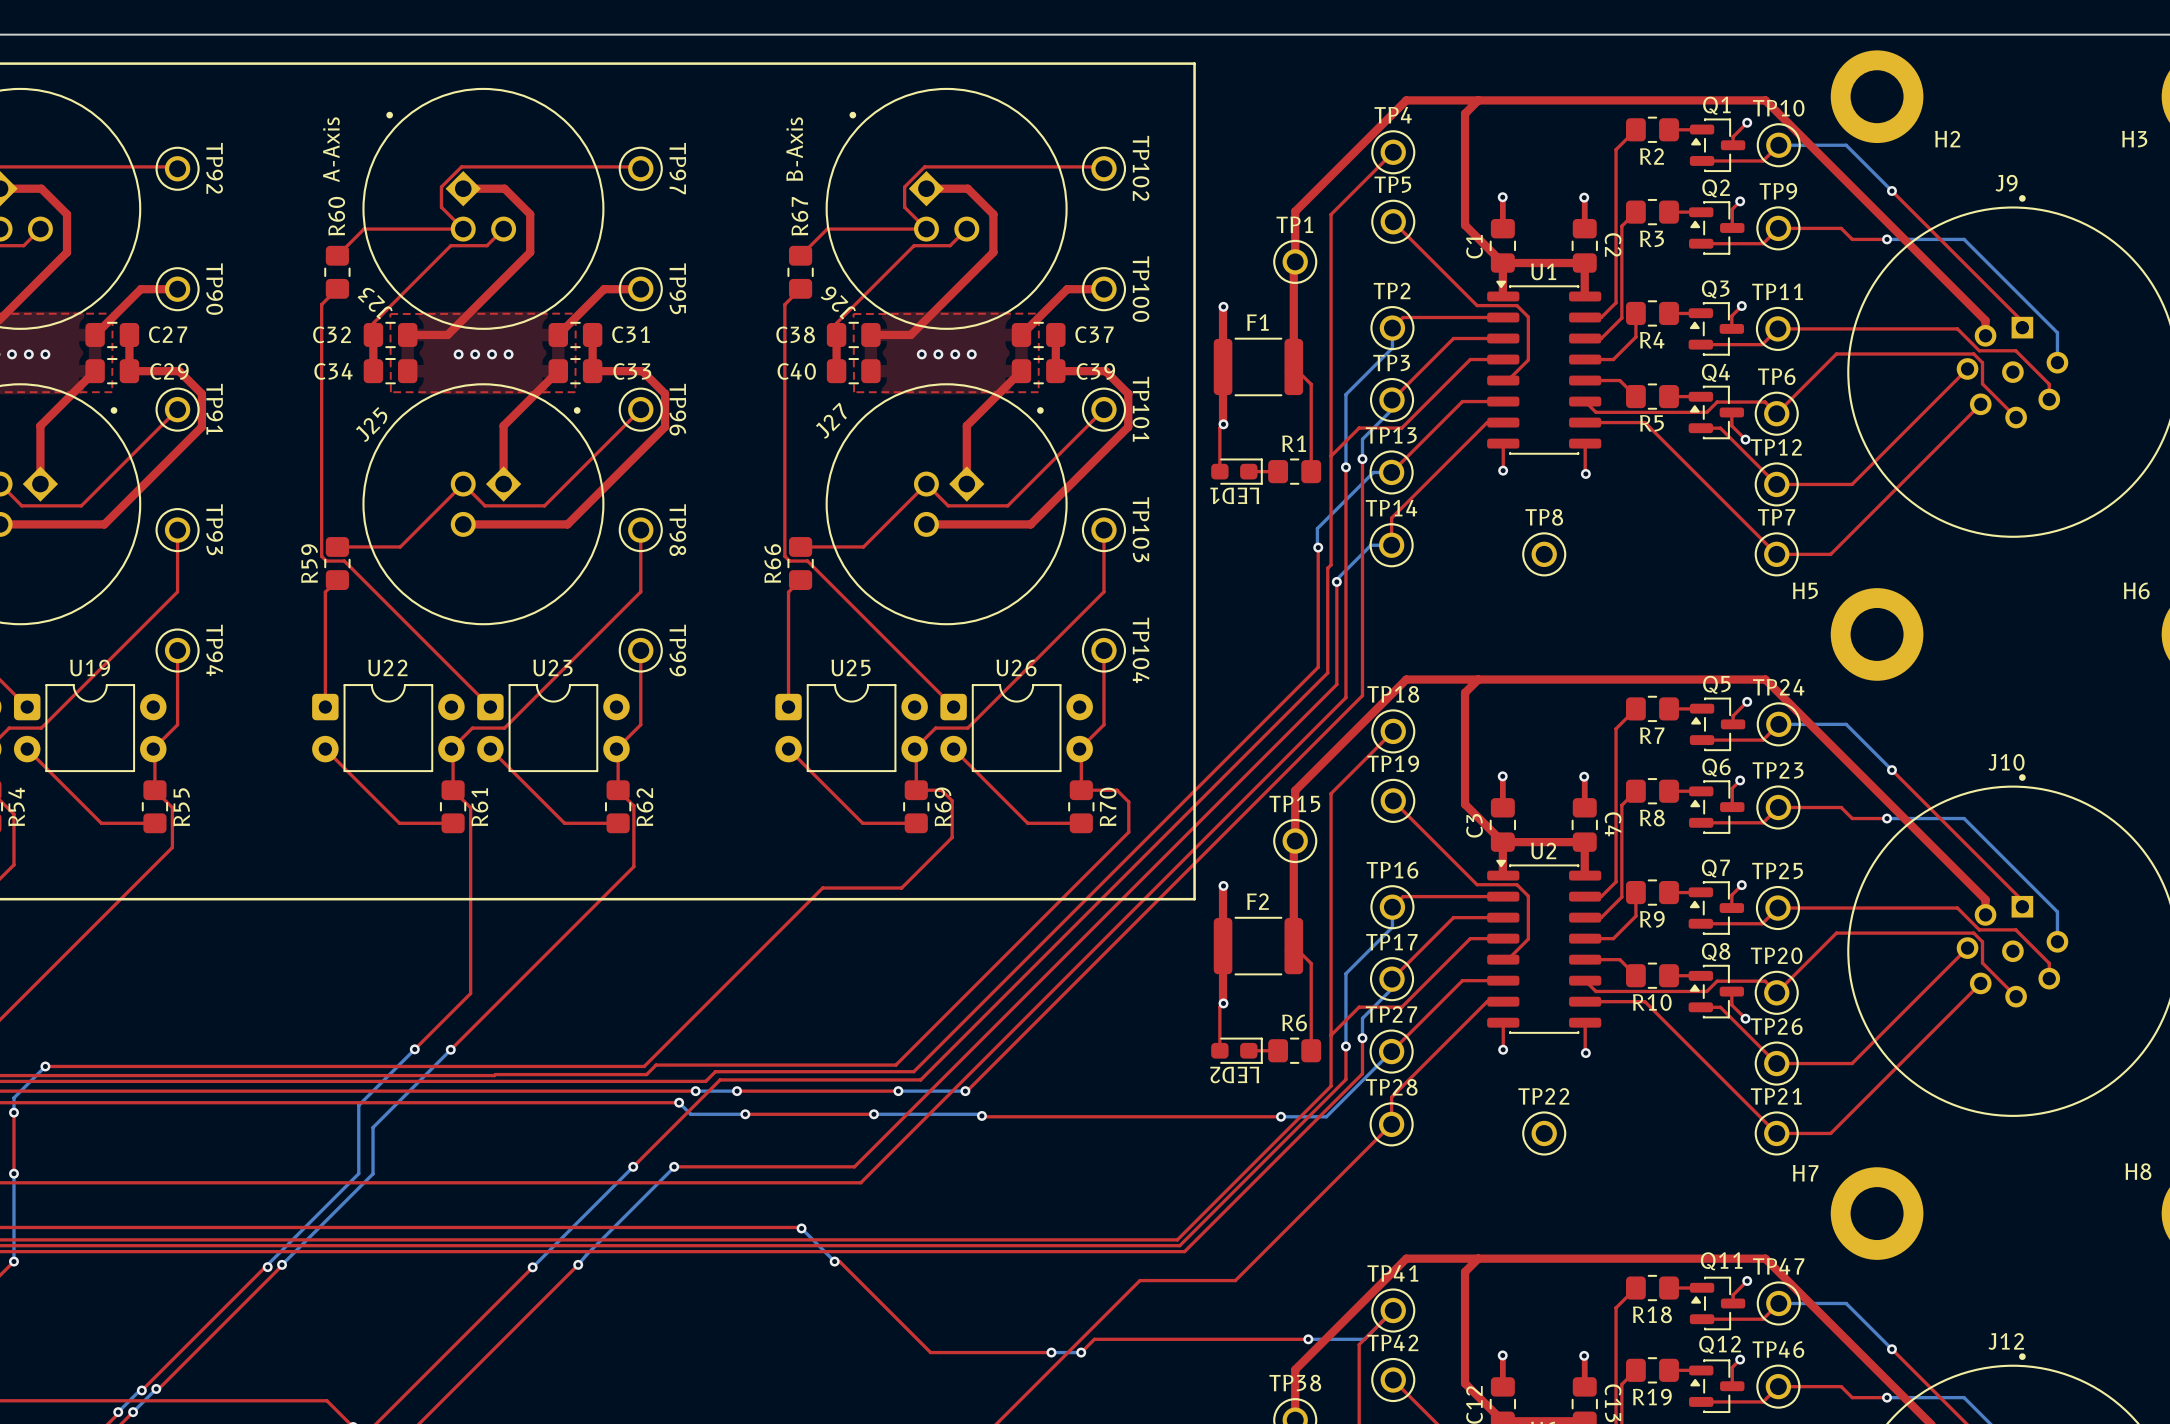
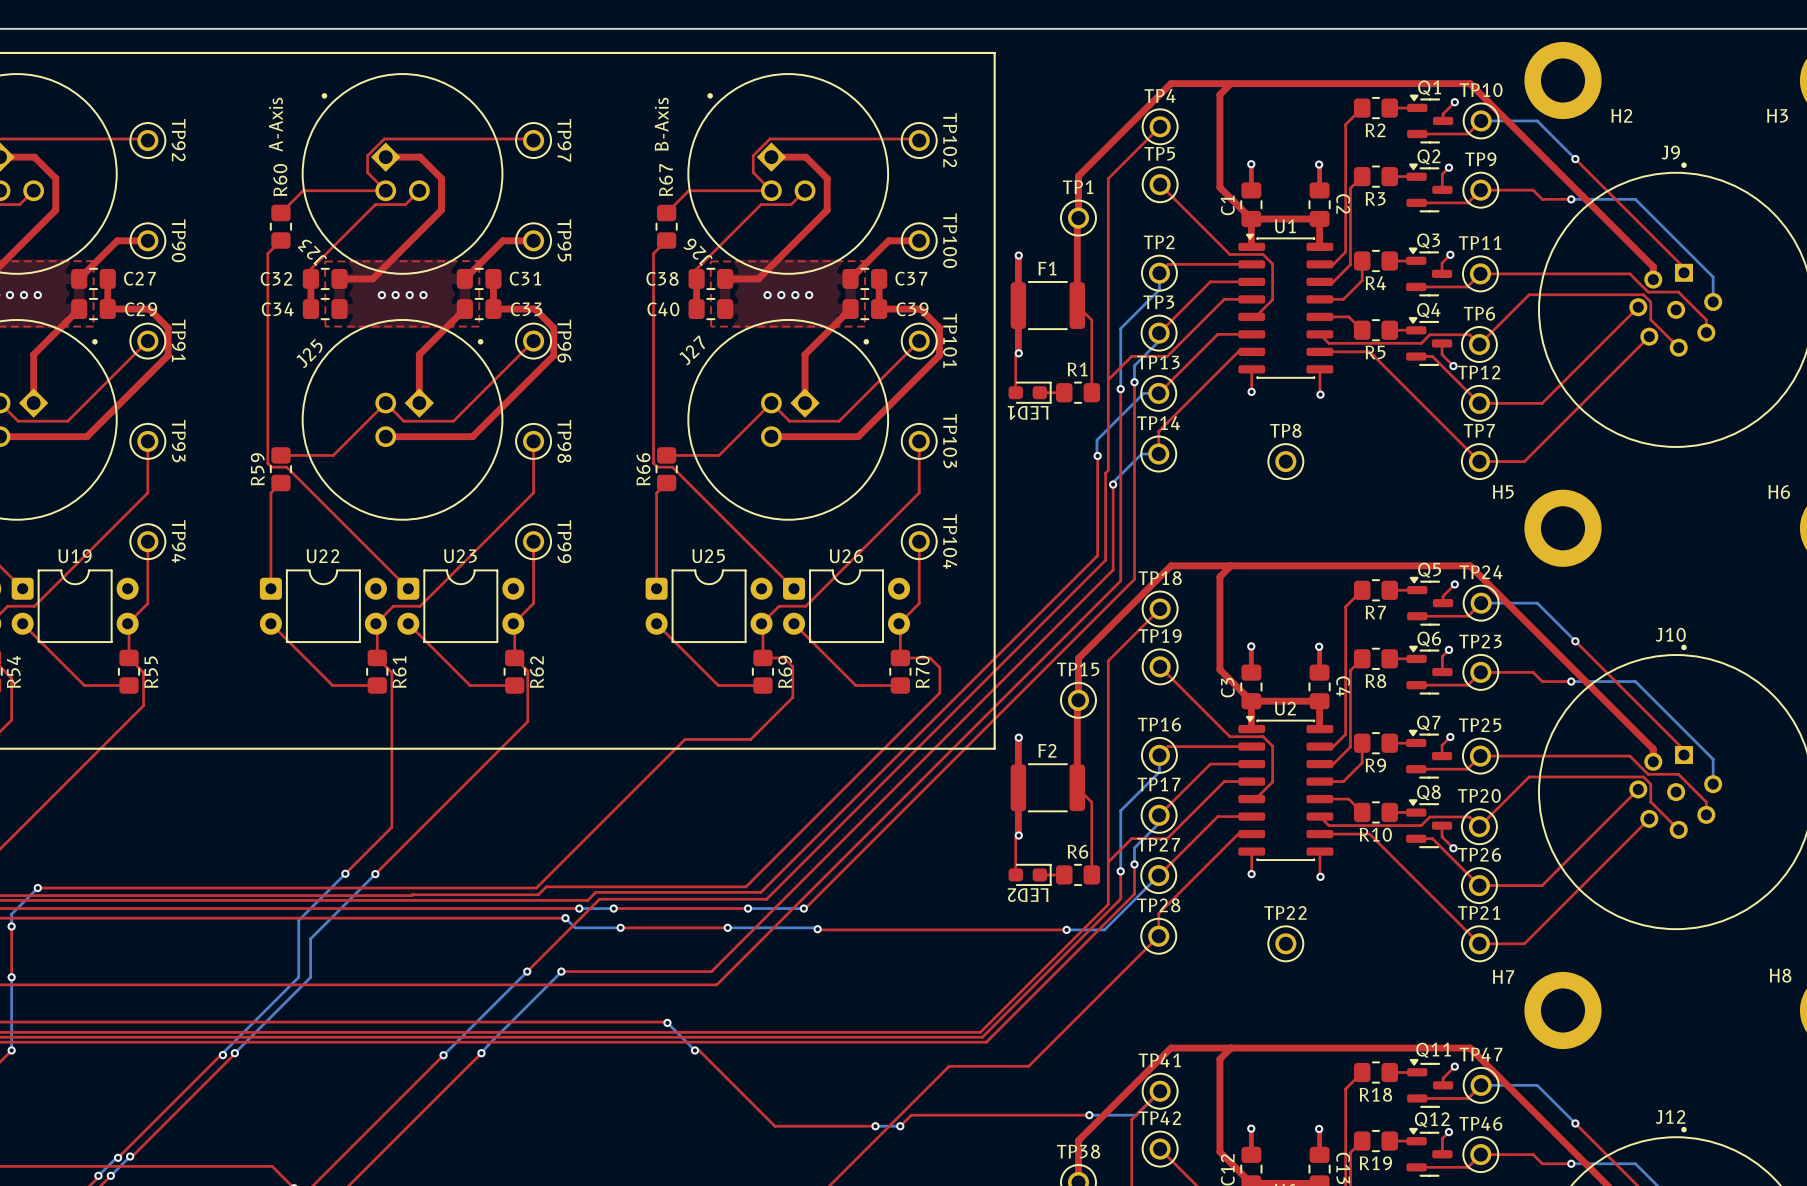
Q1 footprint: [1689, 118, 1746, 173] -> [1407, 94, 1454, 144]
Q2 footprint: [1689, 201, 1745, 255] -> [1406, 163, 1453, 213]
Q3 footprint: [1688, 302, 1745, 356] -> [1406, 247, 1453, 297]
Q4 footprint: [1688, 385, 1745, 440] -> [1406, 317, 1453, 366]
Q5 footprint: [1689, 697, 1746, 752] -> [1407, 576, 1454, 626]
Q6 footprint: [1689, 780, 1745, 834] -> [1406, 645, 1453, 695]
Q7 footprint: [1688, 881, 1745, 935] -> [1406, 729, 1453, 779]
Q8 footprint: [1688, 964, 1745, 1019] -> [1406, 799, 1453, 849]
Q11 footprint: [1689, 1276, 1746, 1331] -> [1407, 1058, 1454, 1108]
Q12 footprint: [1689, 1359, 1745, 1414] -> [1406, 1127, 1453, 1177]

